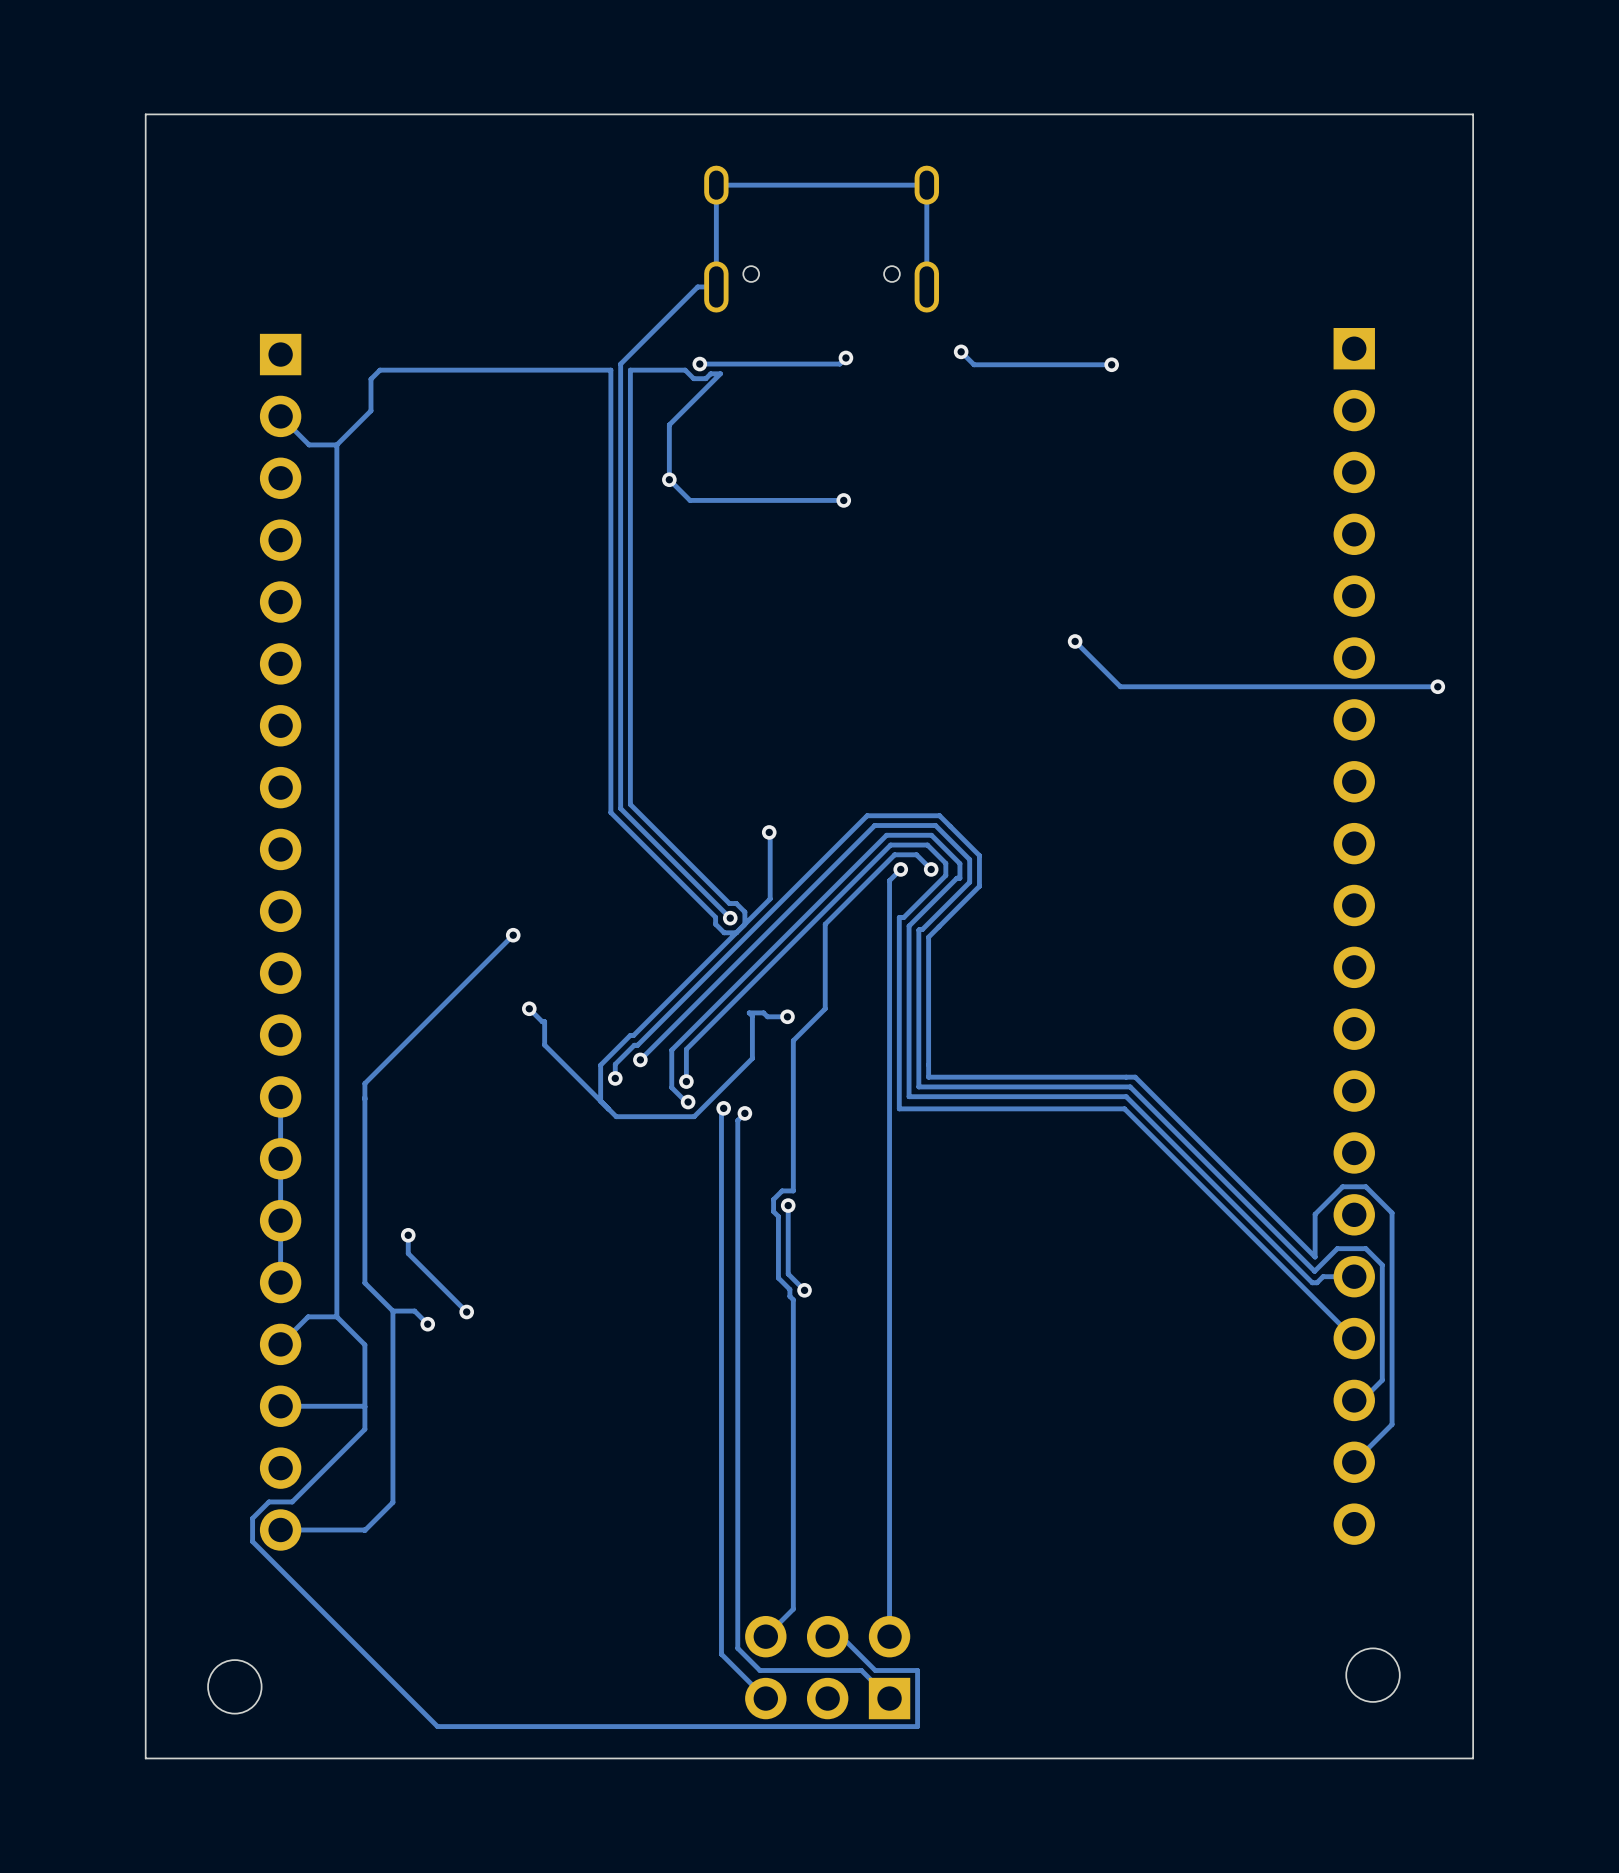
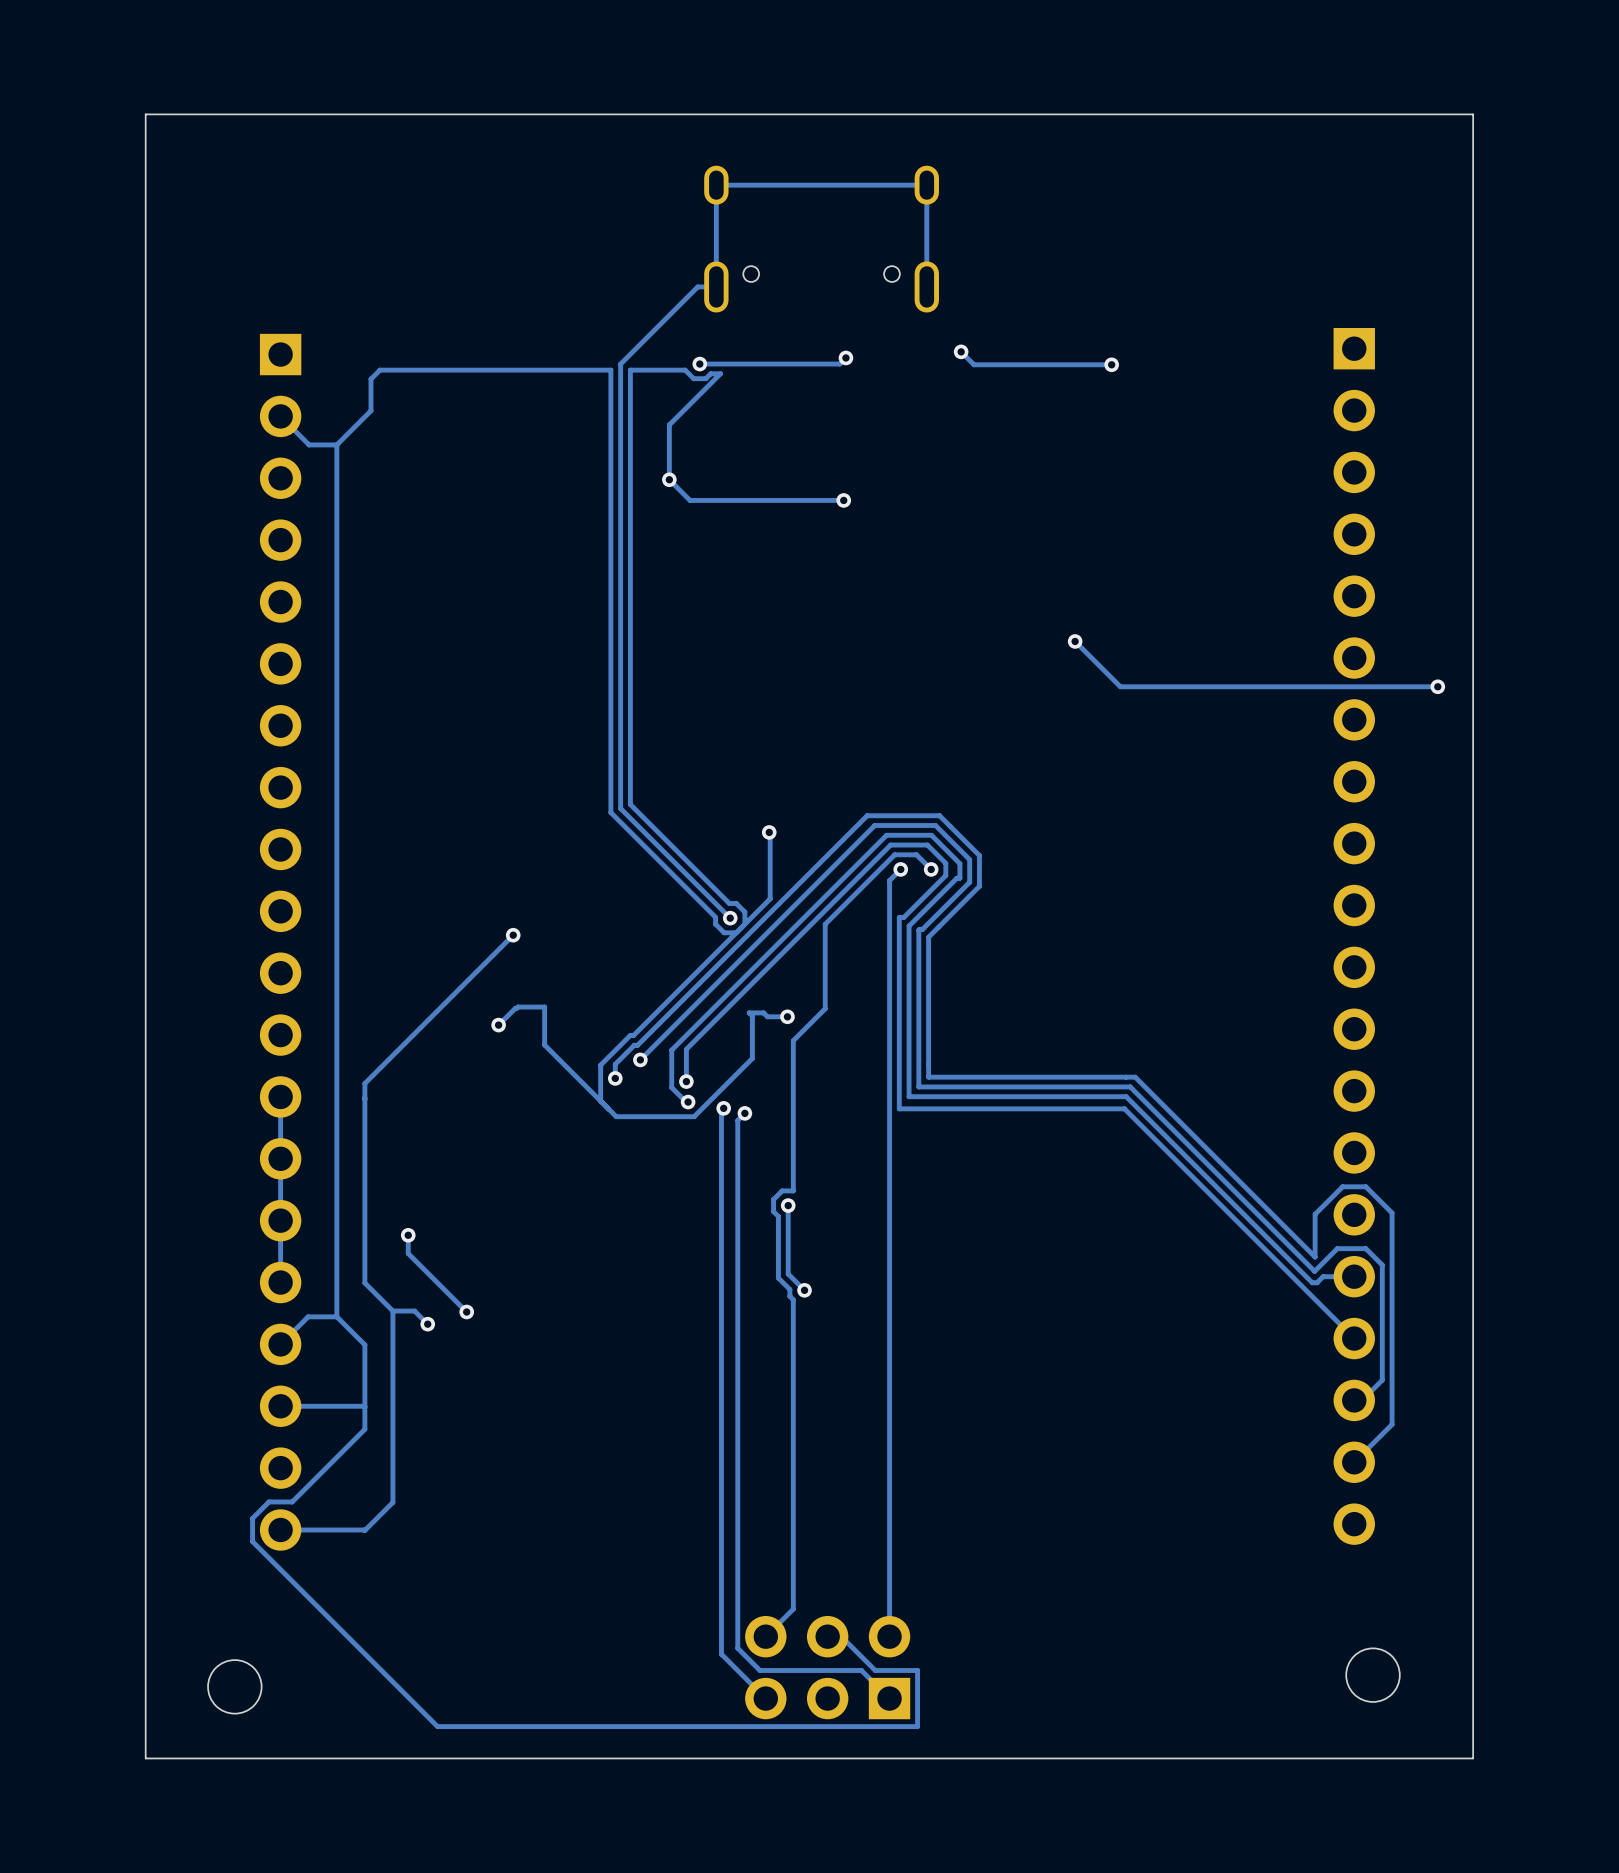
track: (529, 1008) (542, 1021) (544, 1021) -> (498, 1025) (517, 1007) (544, 1007) (544, 1021)
via position: (529, 1008) -> (498, 1025)

